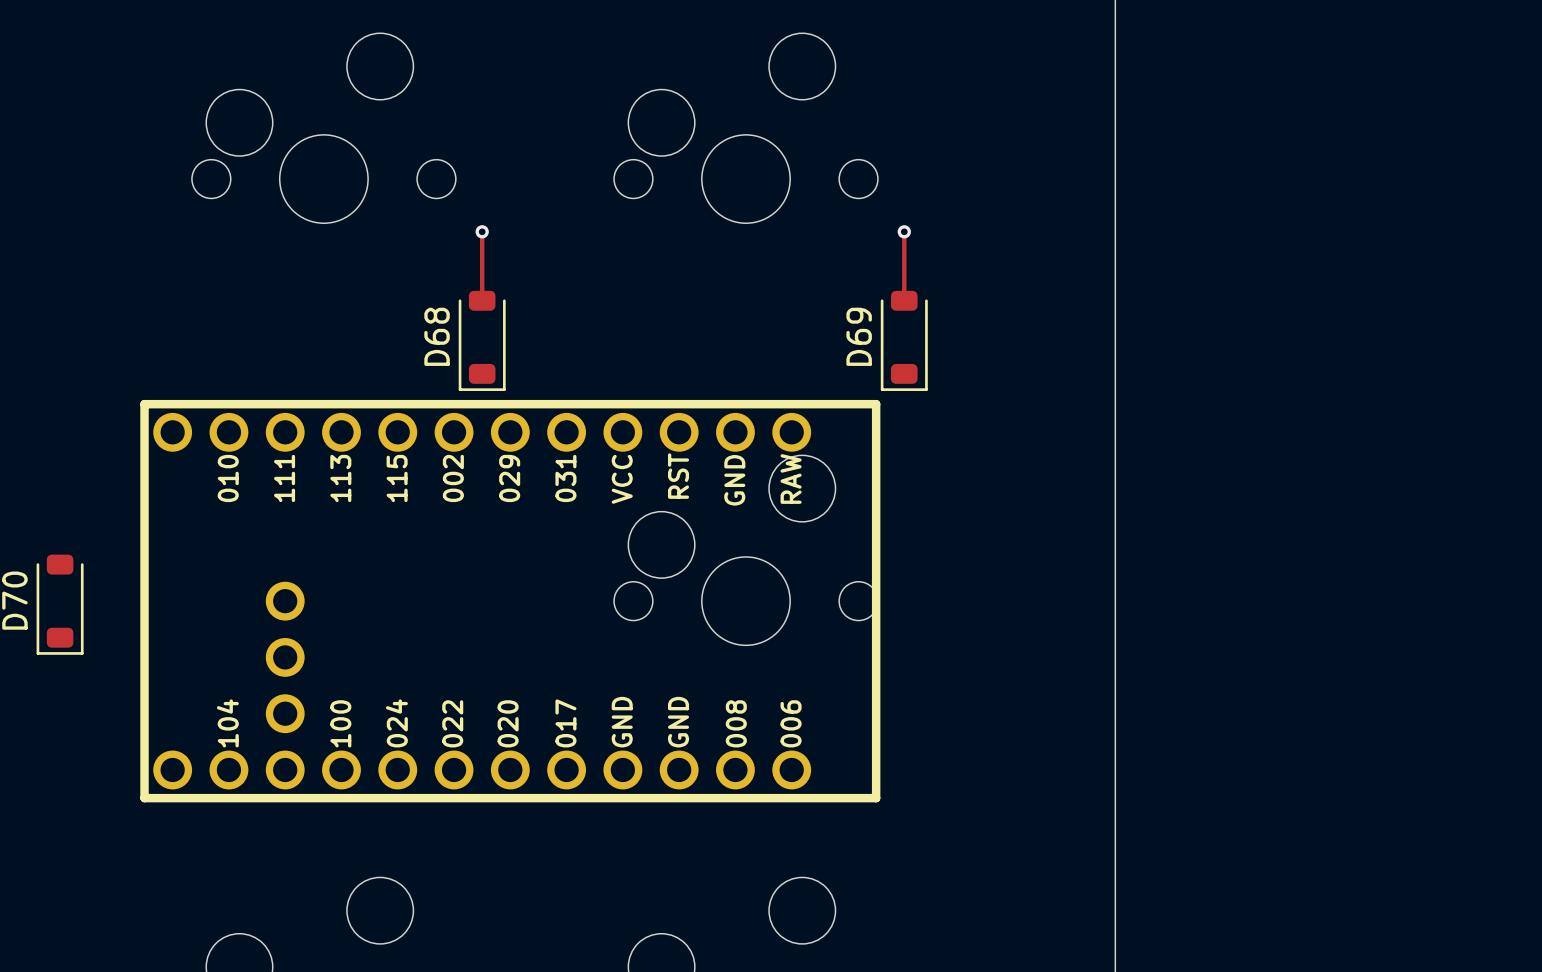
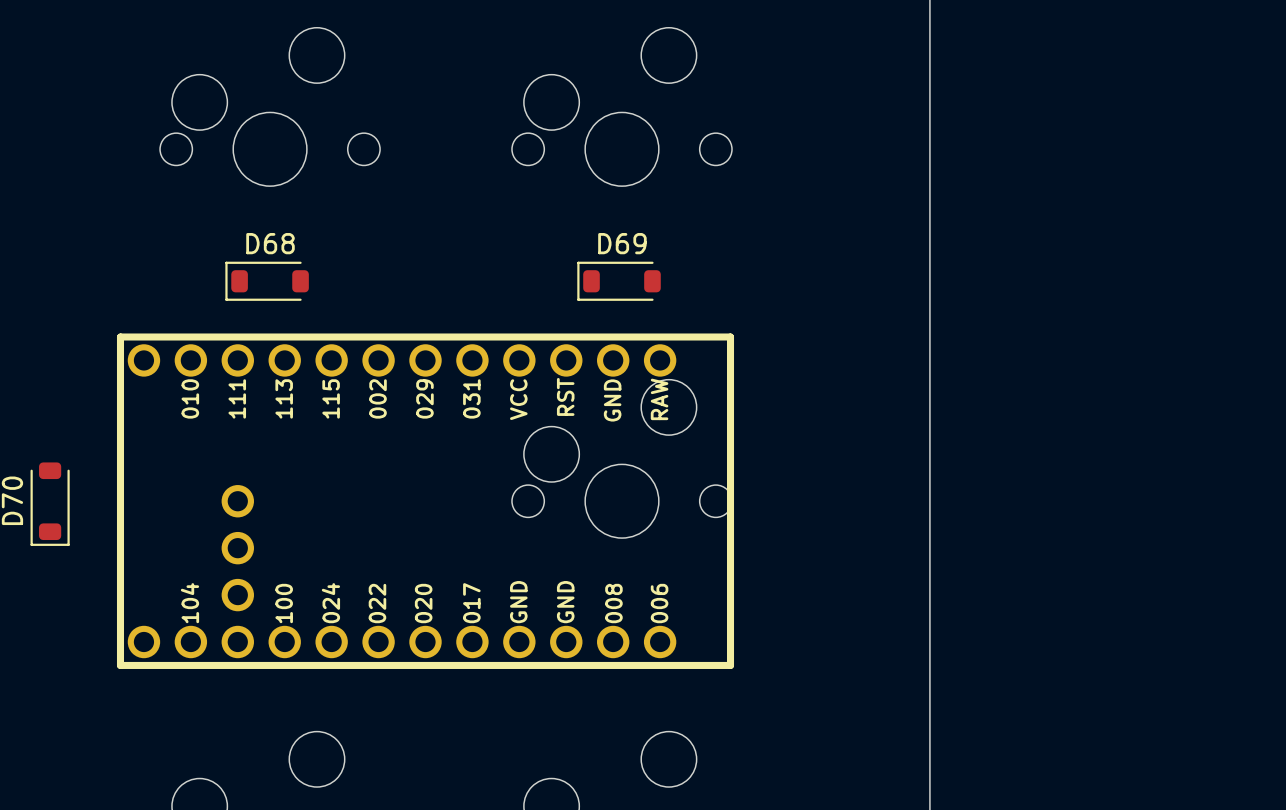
track: (482, 231) (482, 300) -> none
via: (482, 231) -> none
track: (904, 231) (904, 300) -> none
via: (904, 231) -> none
D68 rotation: 0° (482, 340) -> 90° clockwise (267, 281)
D68 position: (482, 340) -> (267, 281)
D69 rotation: 0° (904, 340) -> 90° clockwise (619, 281)
D69 position: (904, 340) -> (619, 281)

